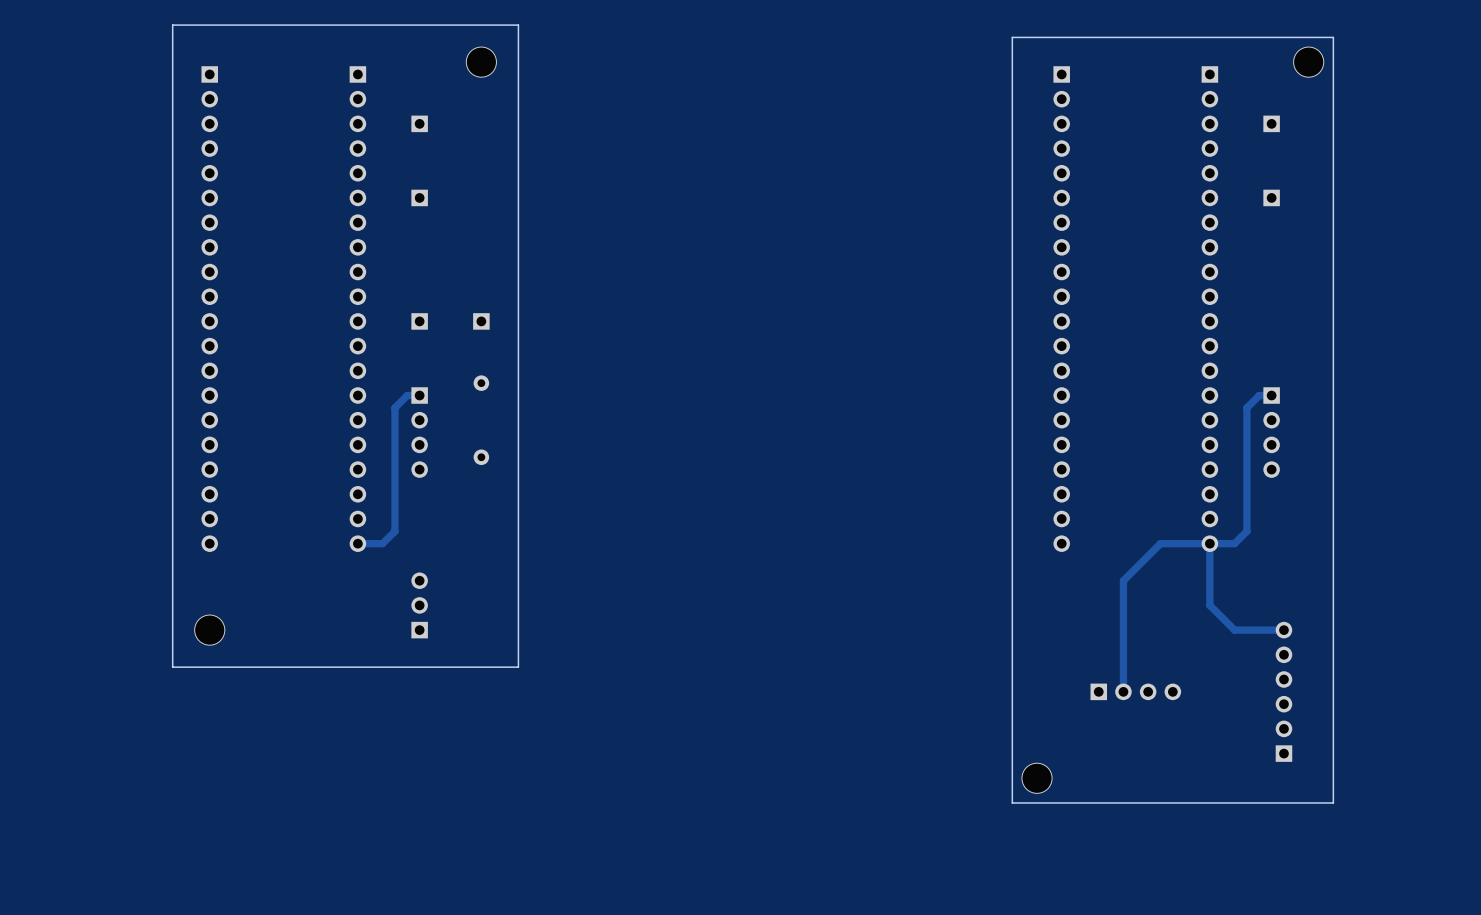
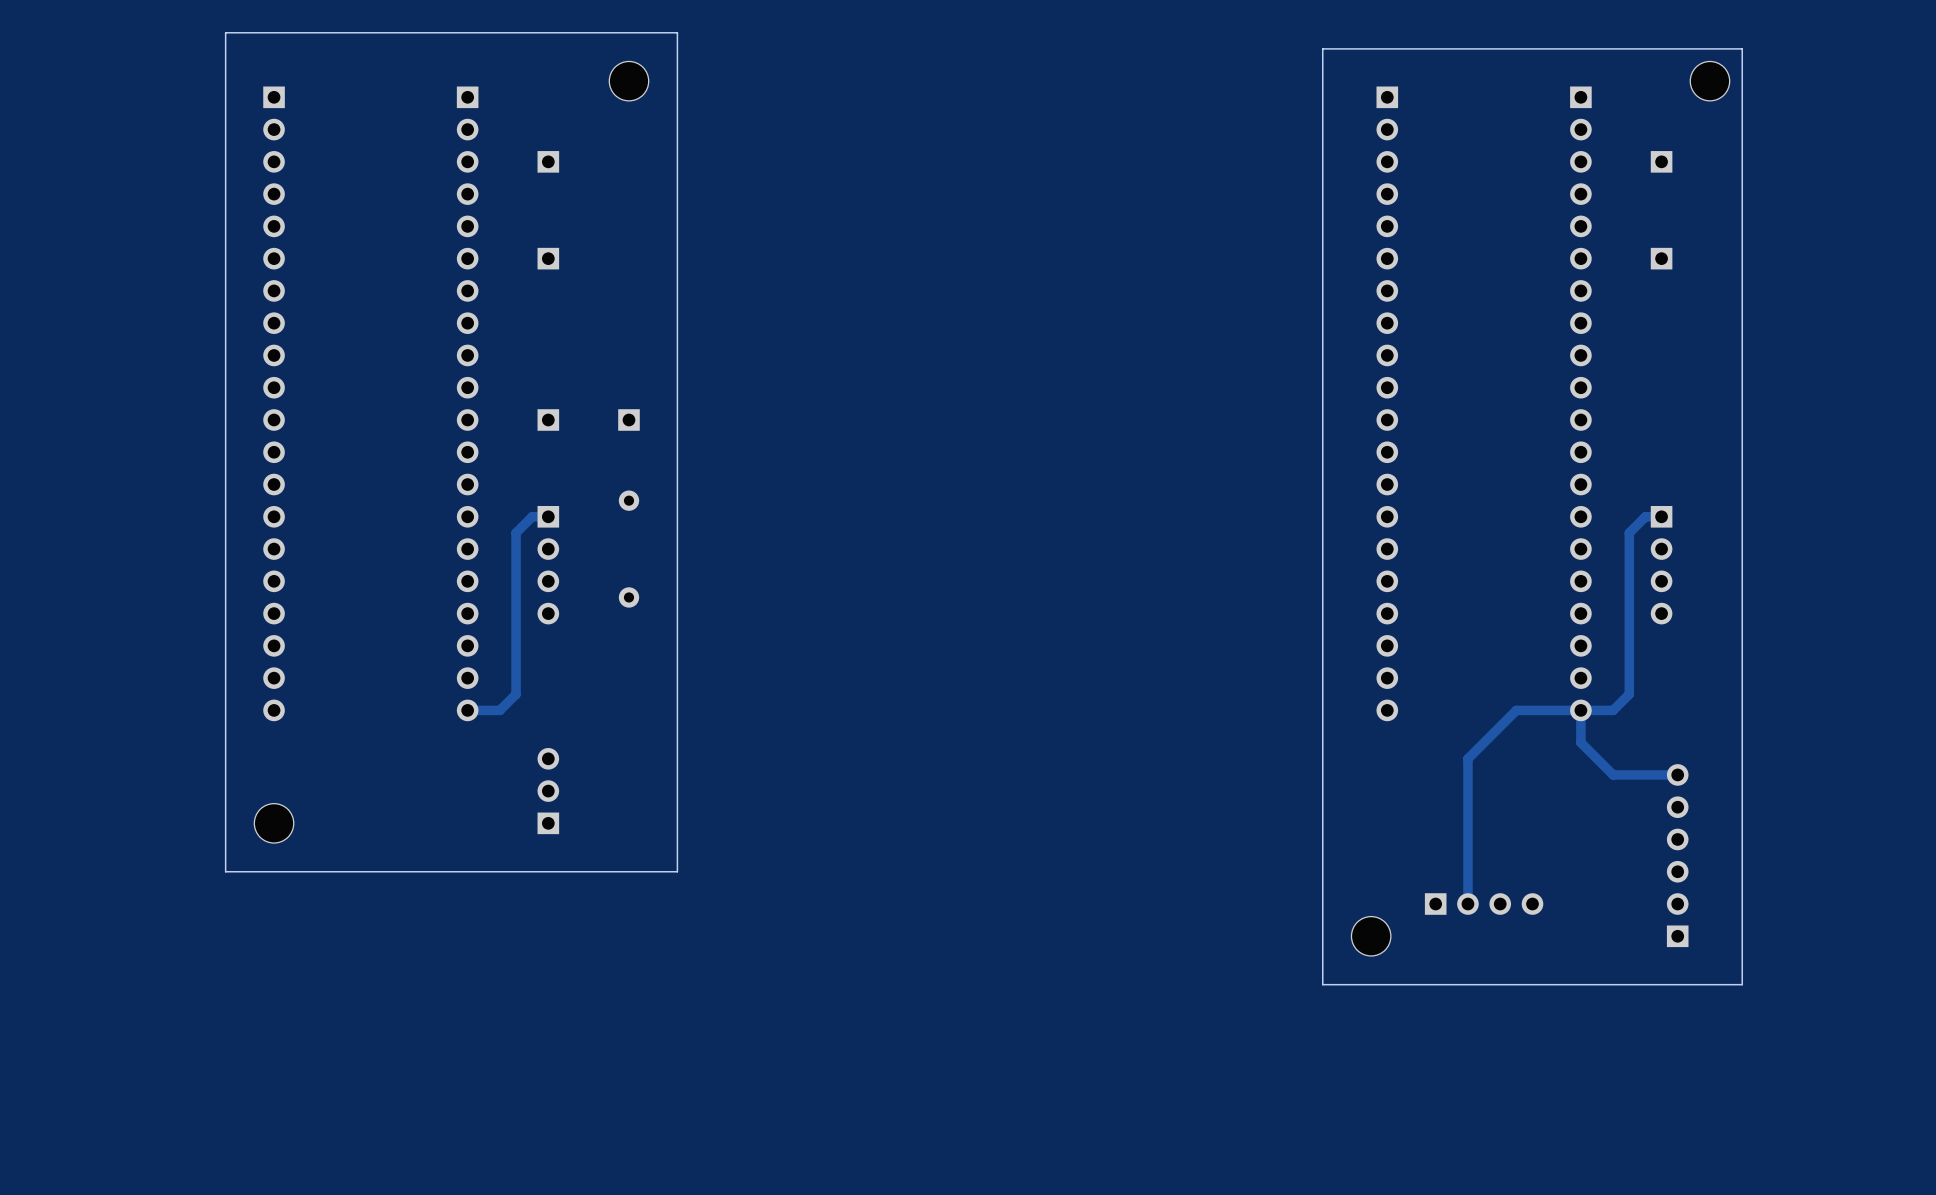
track: (1209, 568) (1209, 605) (1234, 630) (1283, 630) -> (1580, 742) (1613, 774) (1677, 774)
part position: (1283, 691) -> (1677, 855)
board edge: (1333, 753) (1333, 802) (1012, 802) (1012, 753) -> (1742, 984) (1322, 984)
part position: (1037, 778) -> (1371, 936)

